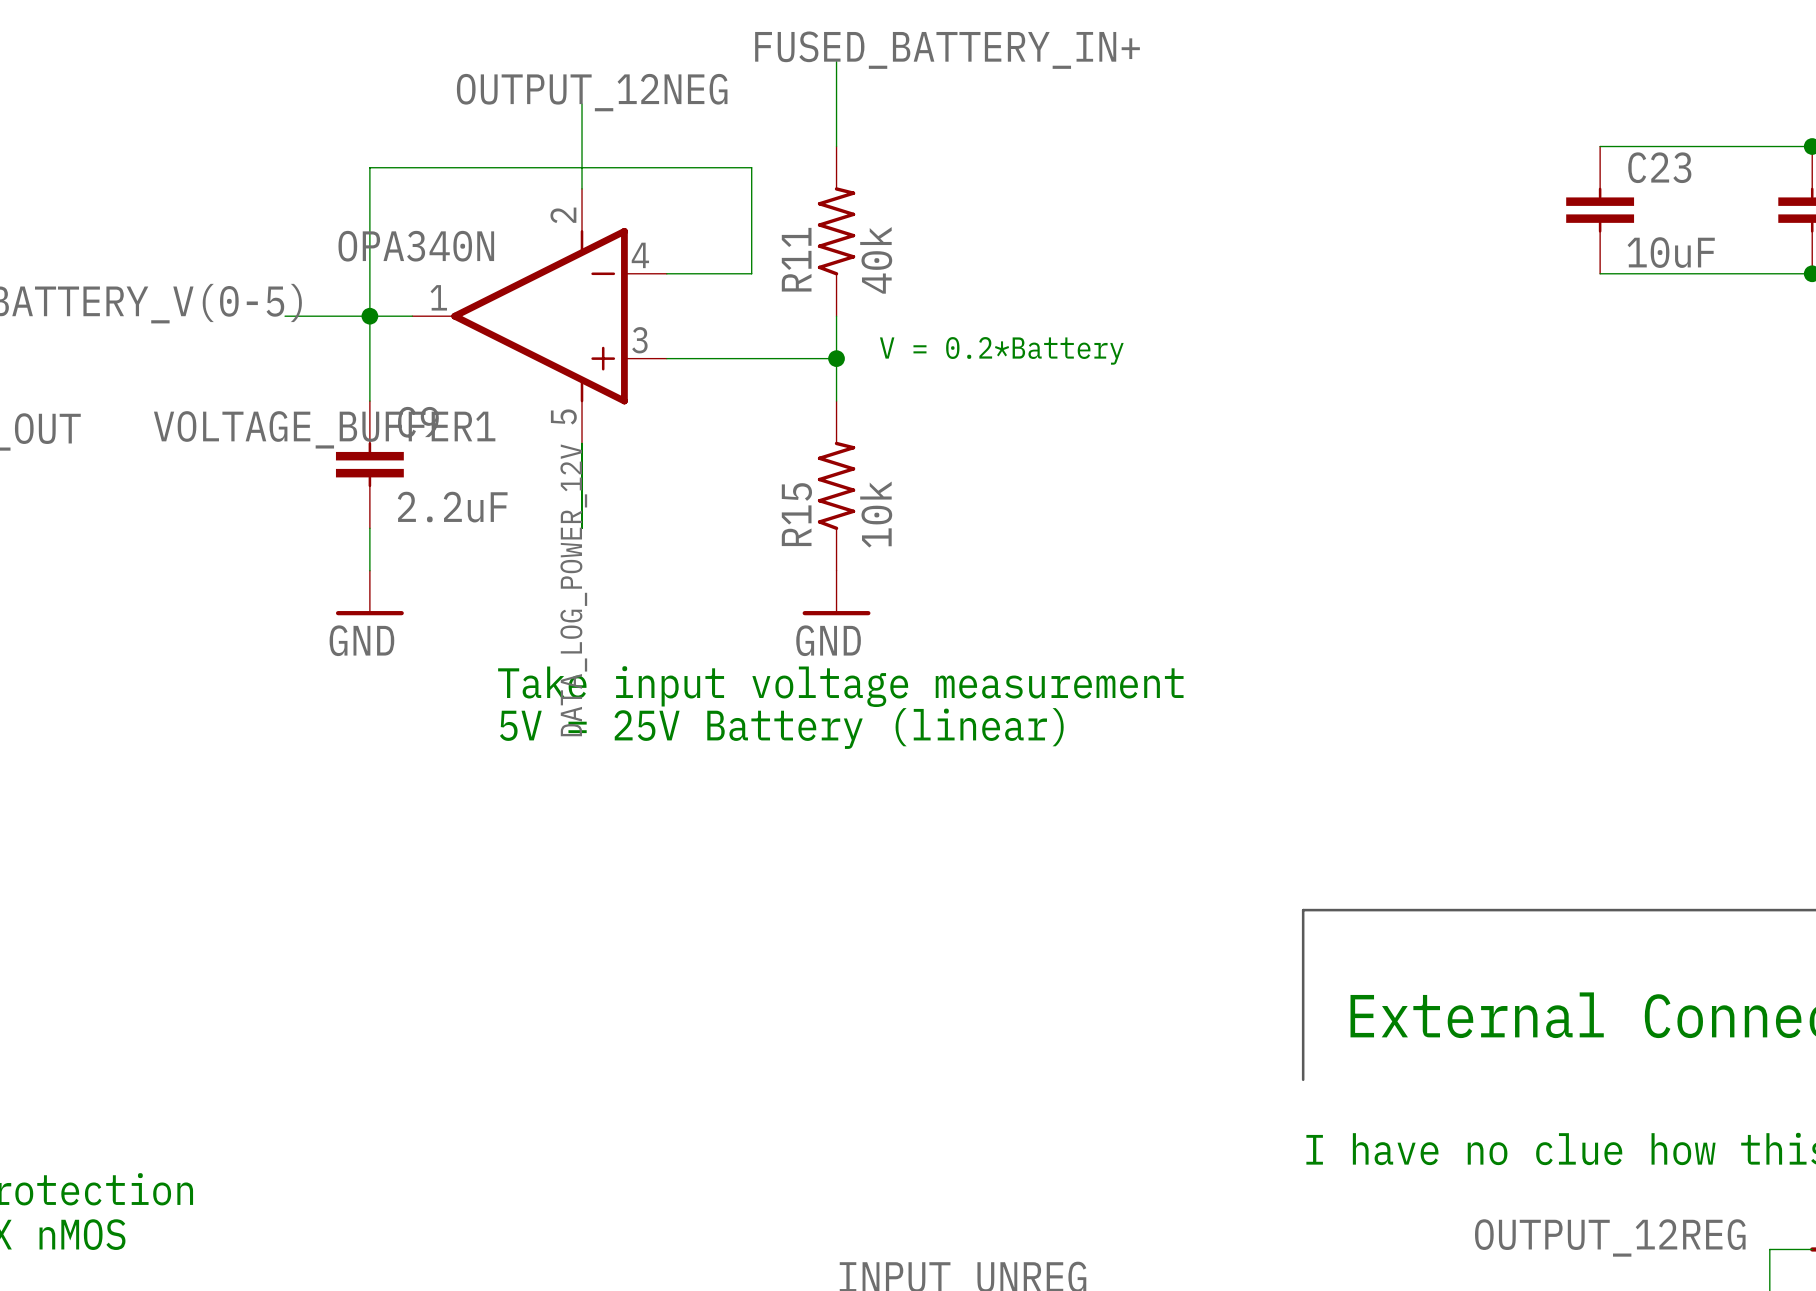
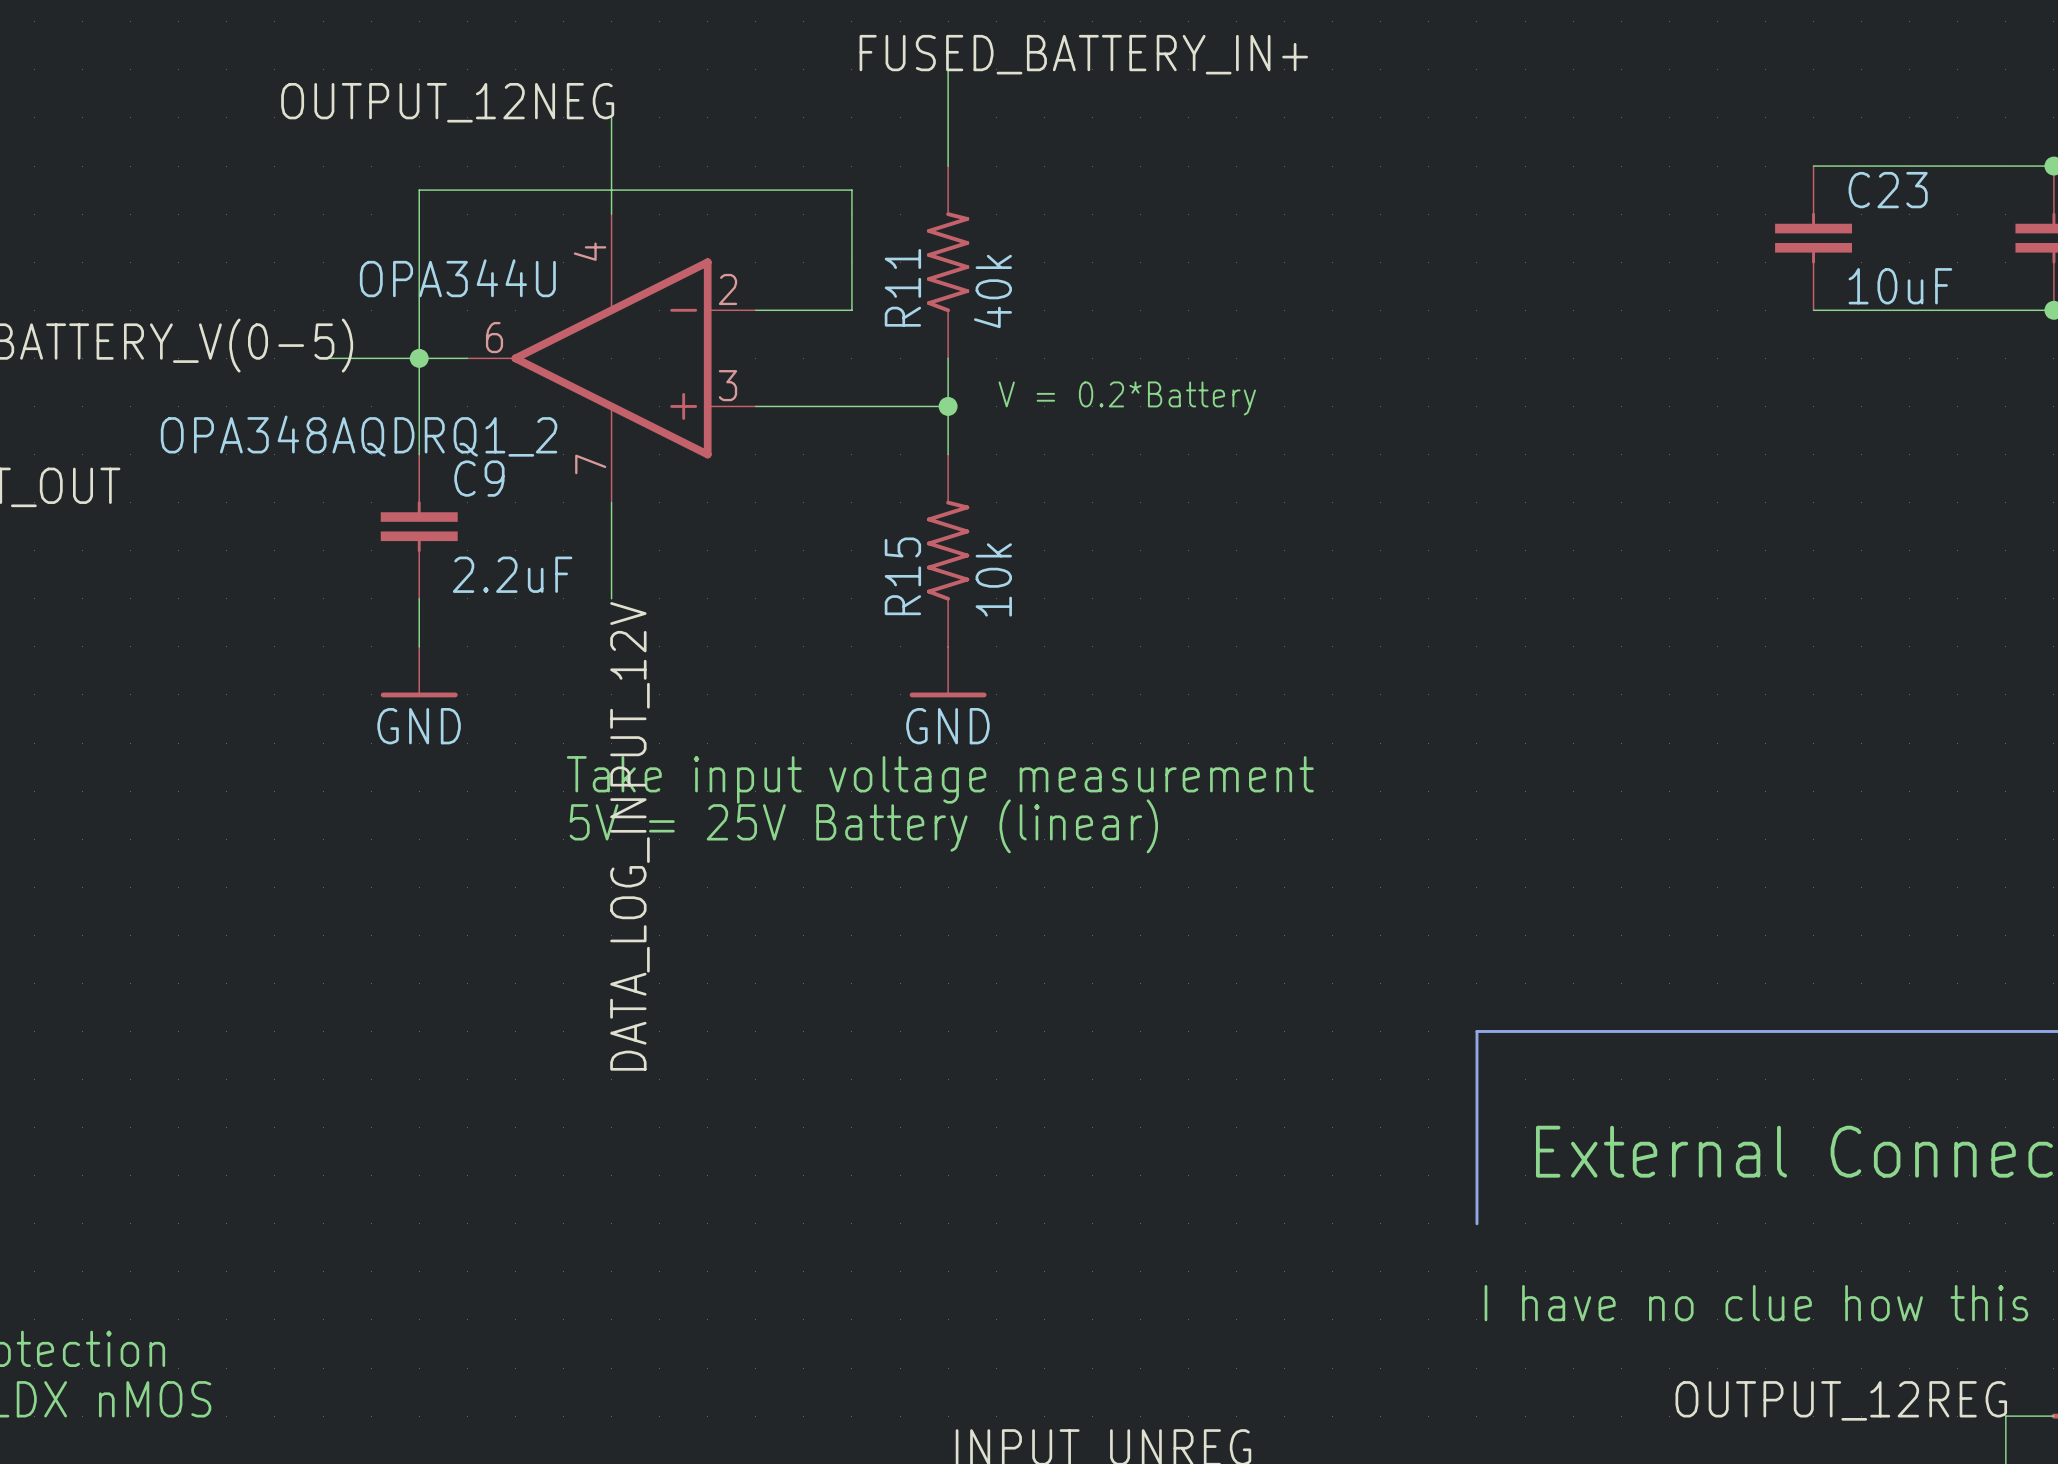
label position: OUTPUT_12NEG (592, 92) -> OUTPUT_12NEG (447, 102)
wire: (582, 104) (582, 188) -> (611, 117) (611, 214)
VOLTAGE_BUFFER1: OPA340N (539, 316) -> none
OPA348AQDRQ1_2: none -> OPA344U (611, 358)
wire: (582, 443) (582, 528) -> (611, 502) (611, 598)
label: DATA_LOG_POWER_12V (573, 590) -> DATA_LOG_INPUT_12V (629, 836)

